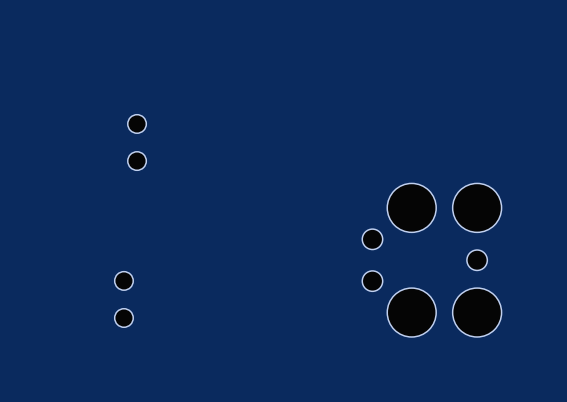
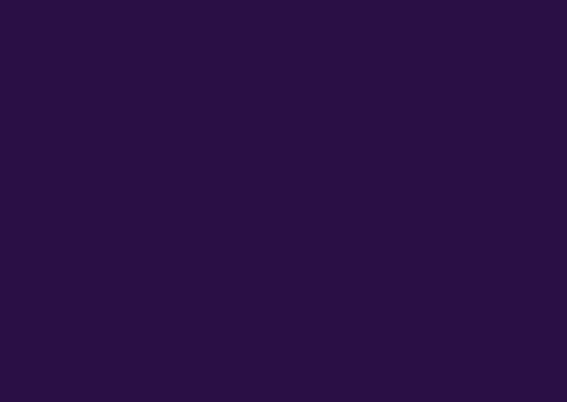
part: (137, 142) -> none
part: (431, 260) -> none
part: (123, 299) -> none

